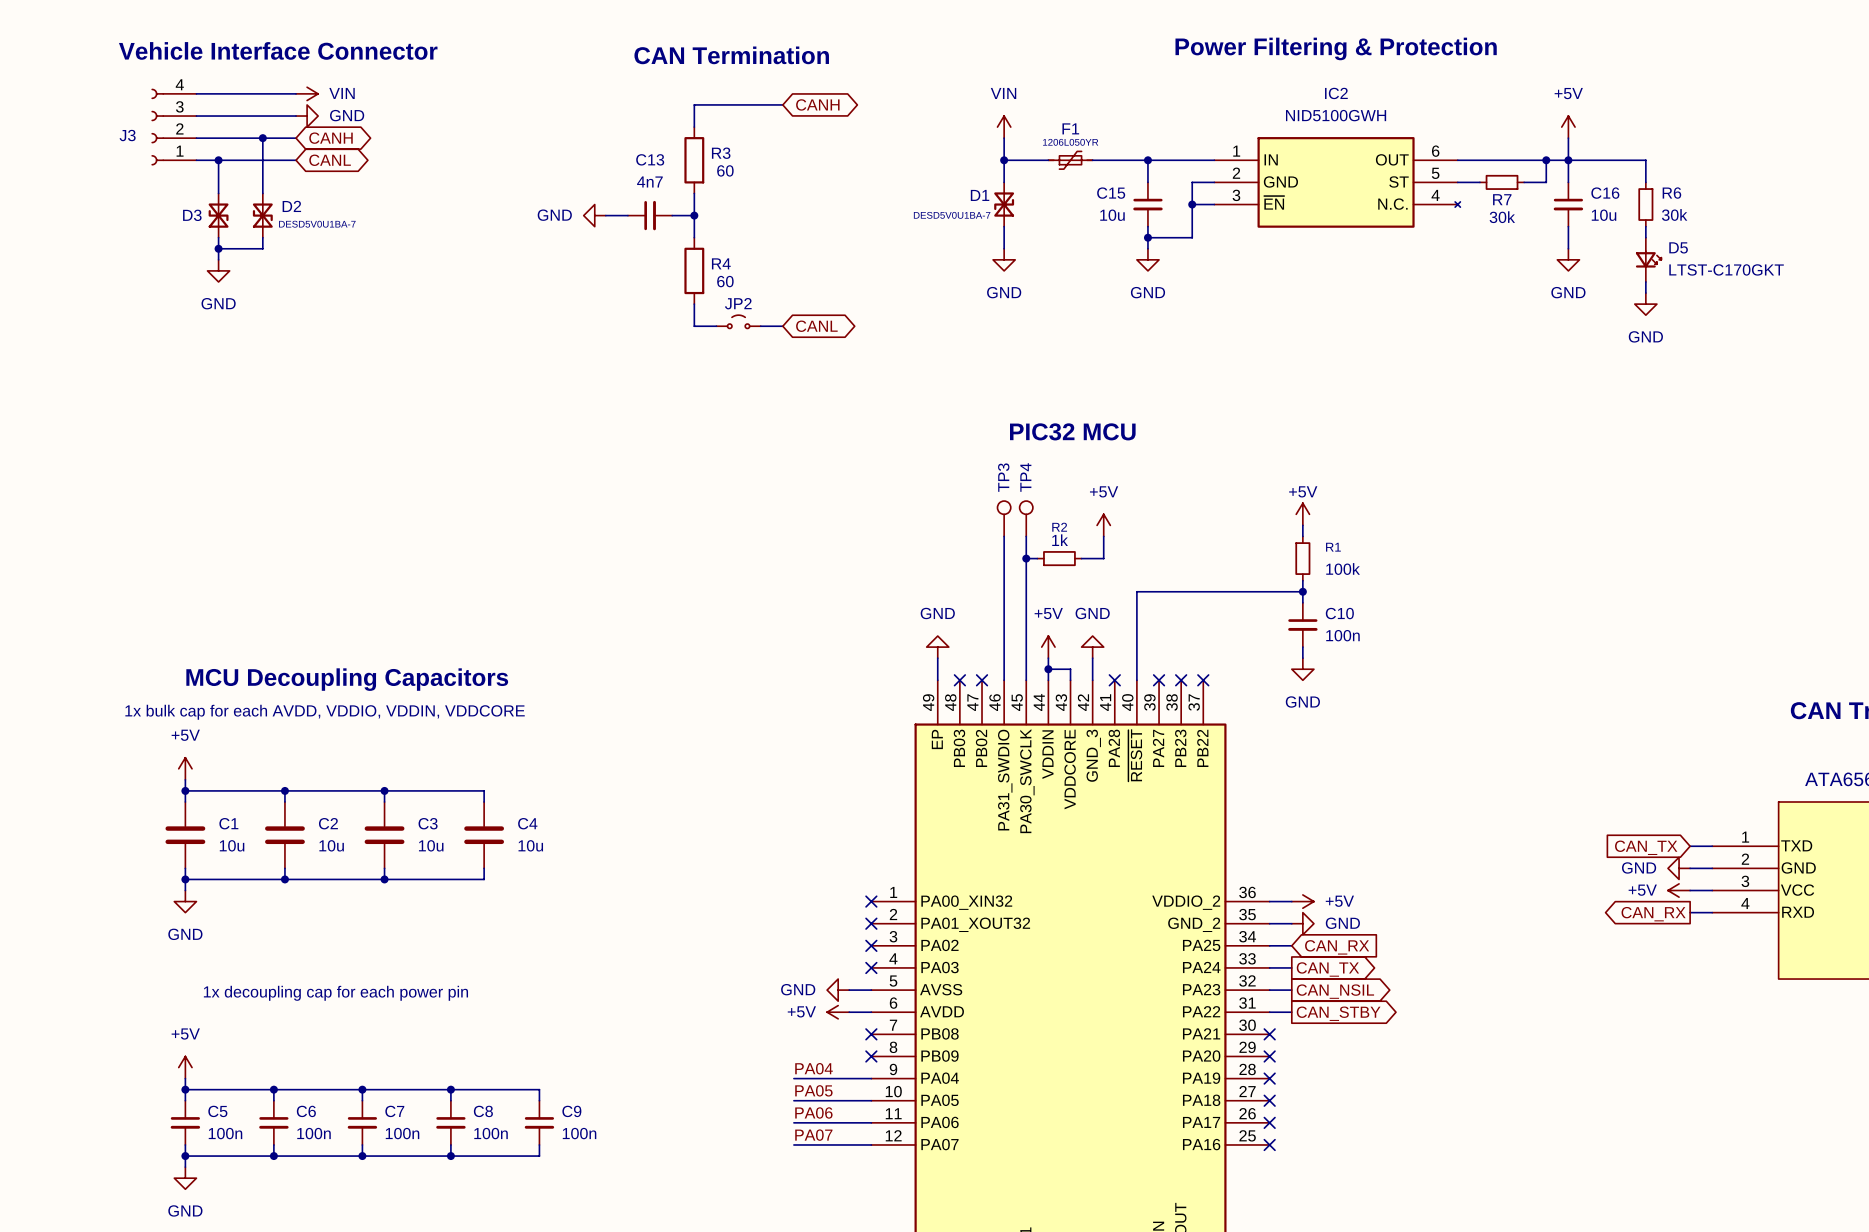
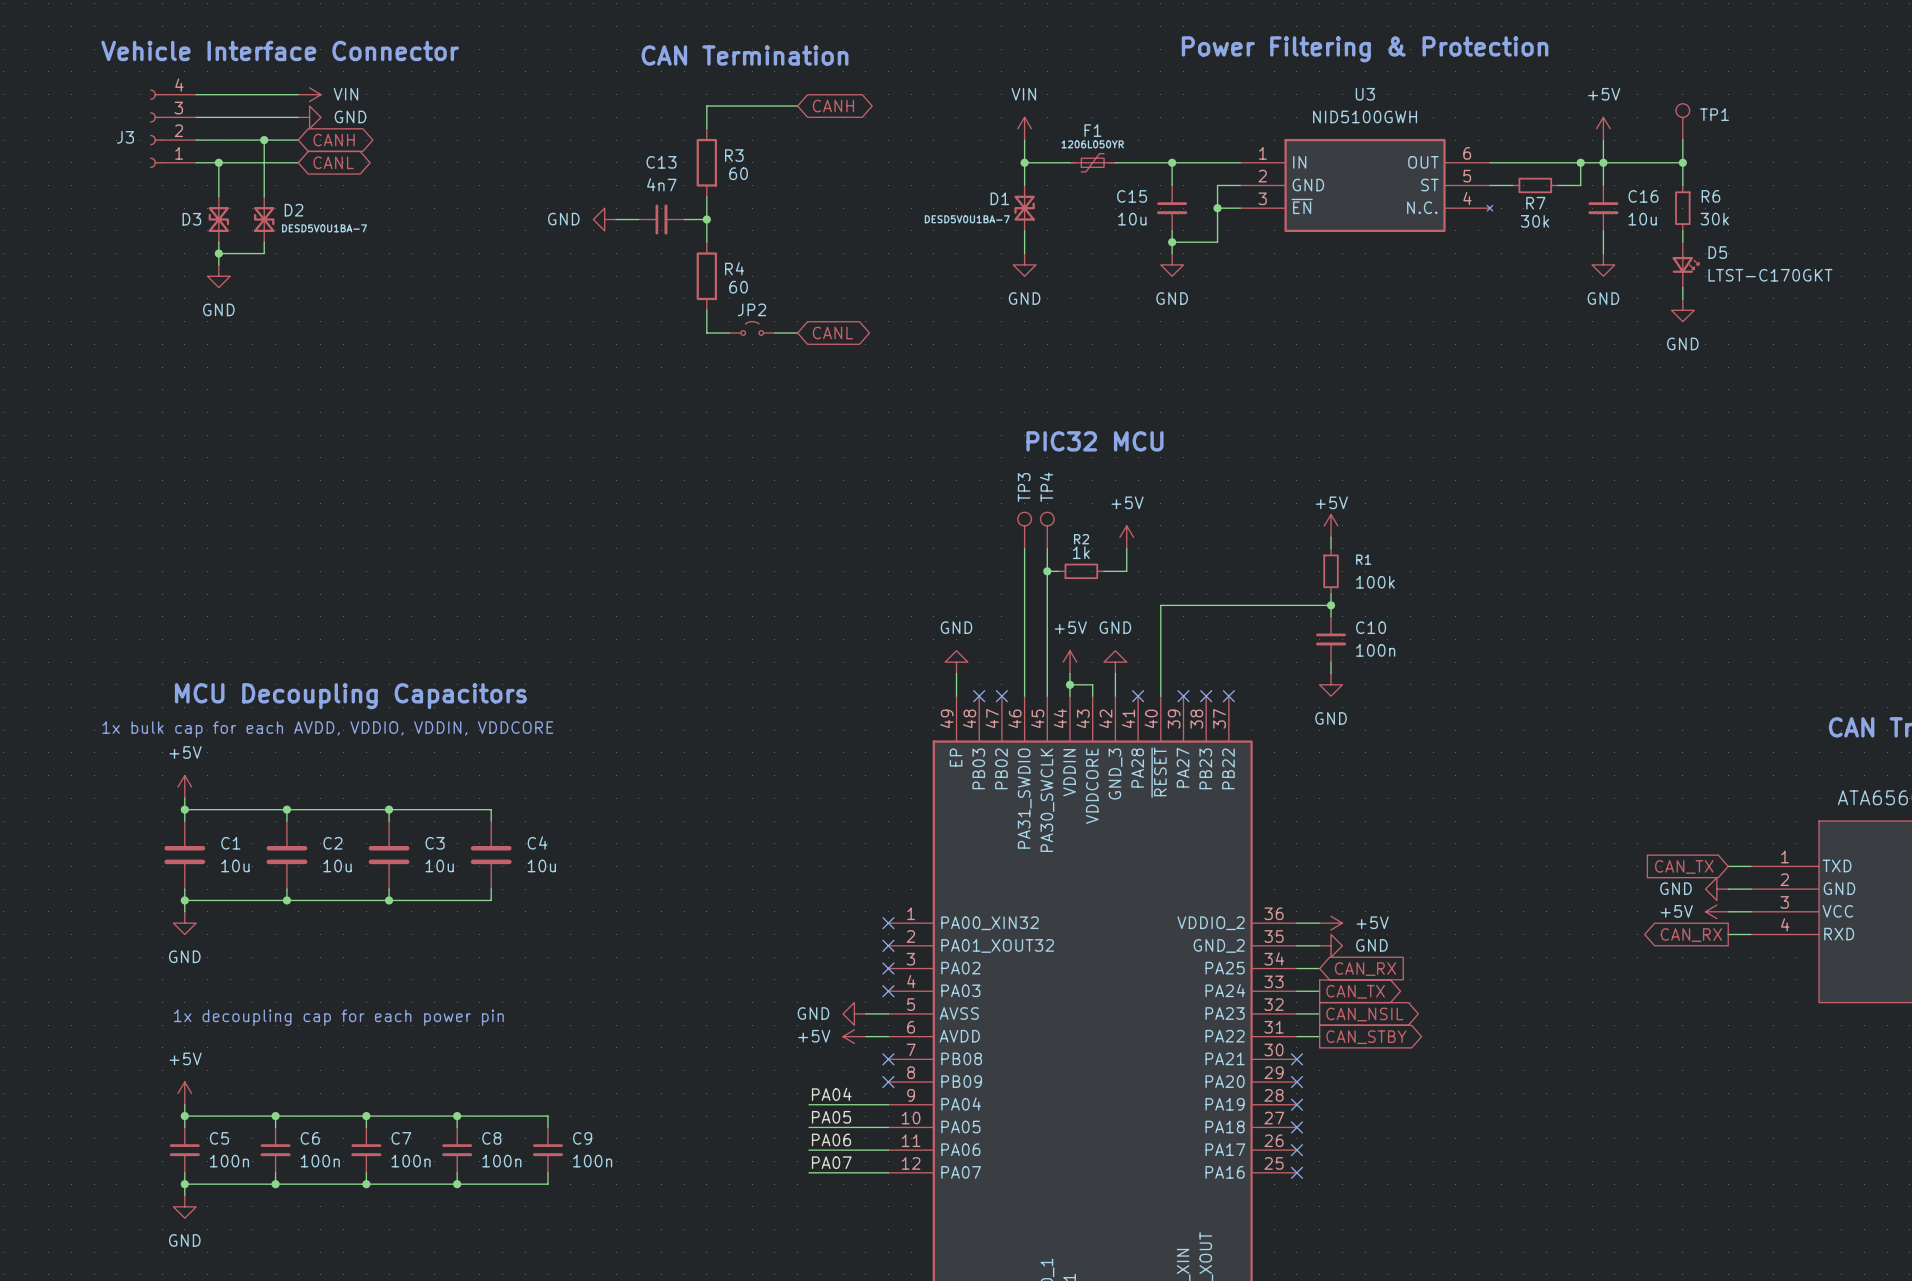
IC2 name: IC2 (1336, 93) -> U3 (1365, 94)
TP1: none -> (1682, 121)
wire: none -> (1682, 140) (1682, 162)
junction: none -> (1682, 162)

